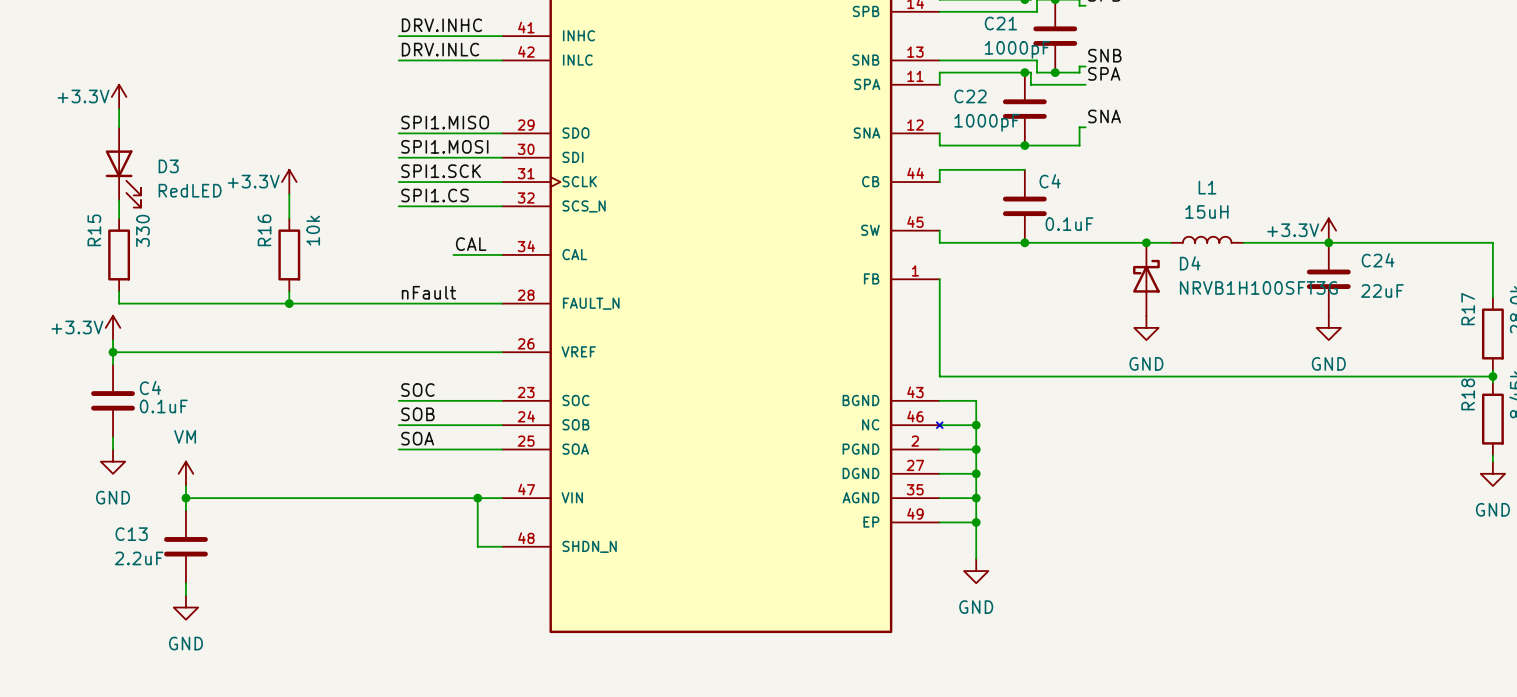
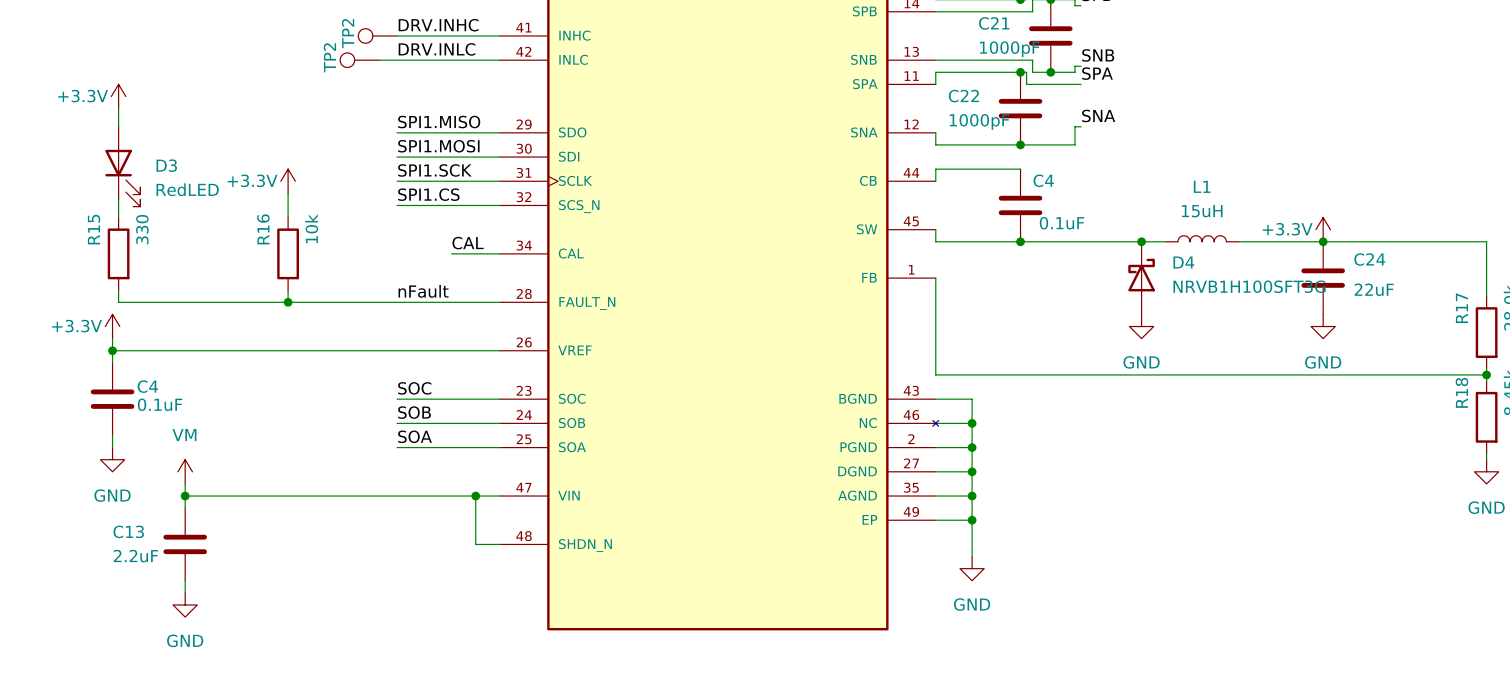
TP2: none -> (377, 35)
TP2: none -> (359, 60)
wire: none -> (378, 60) (397, 60)

